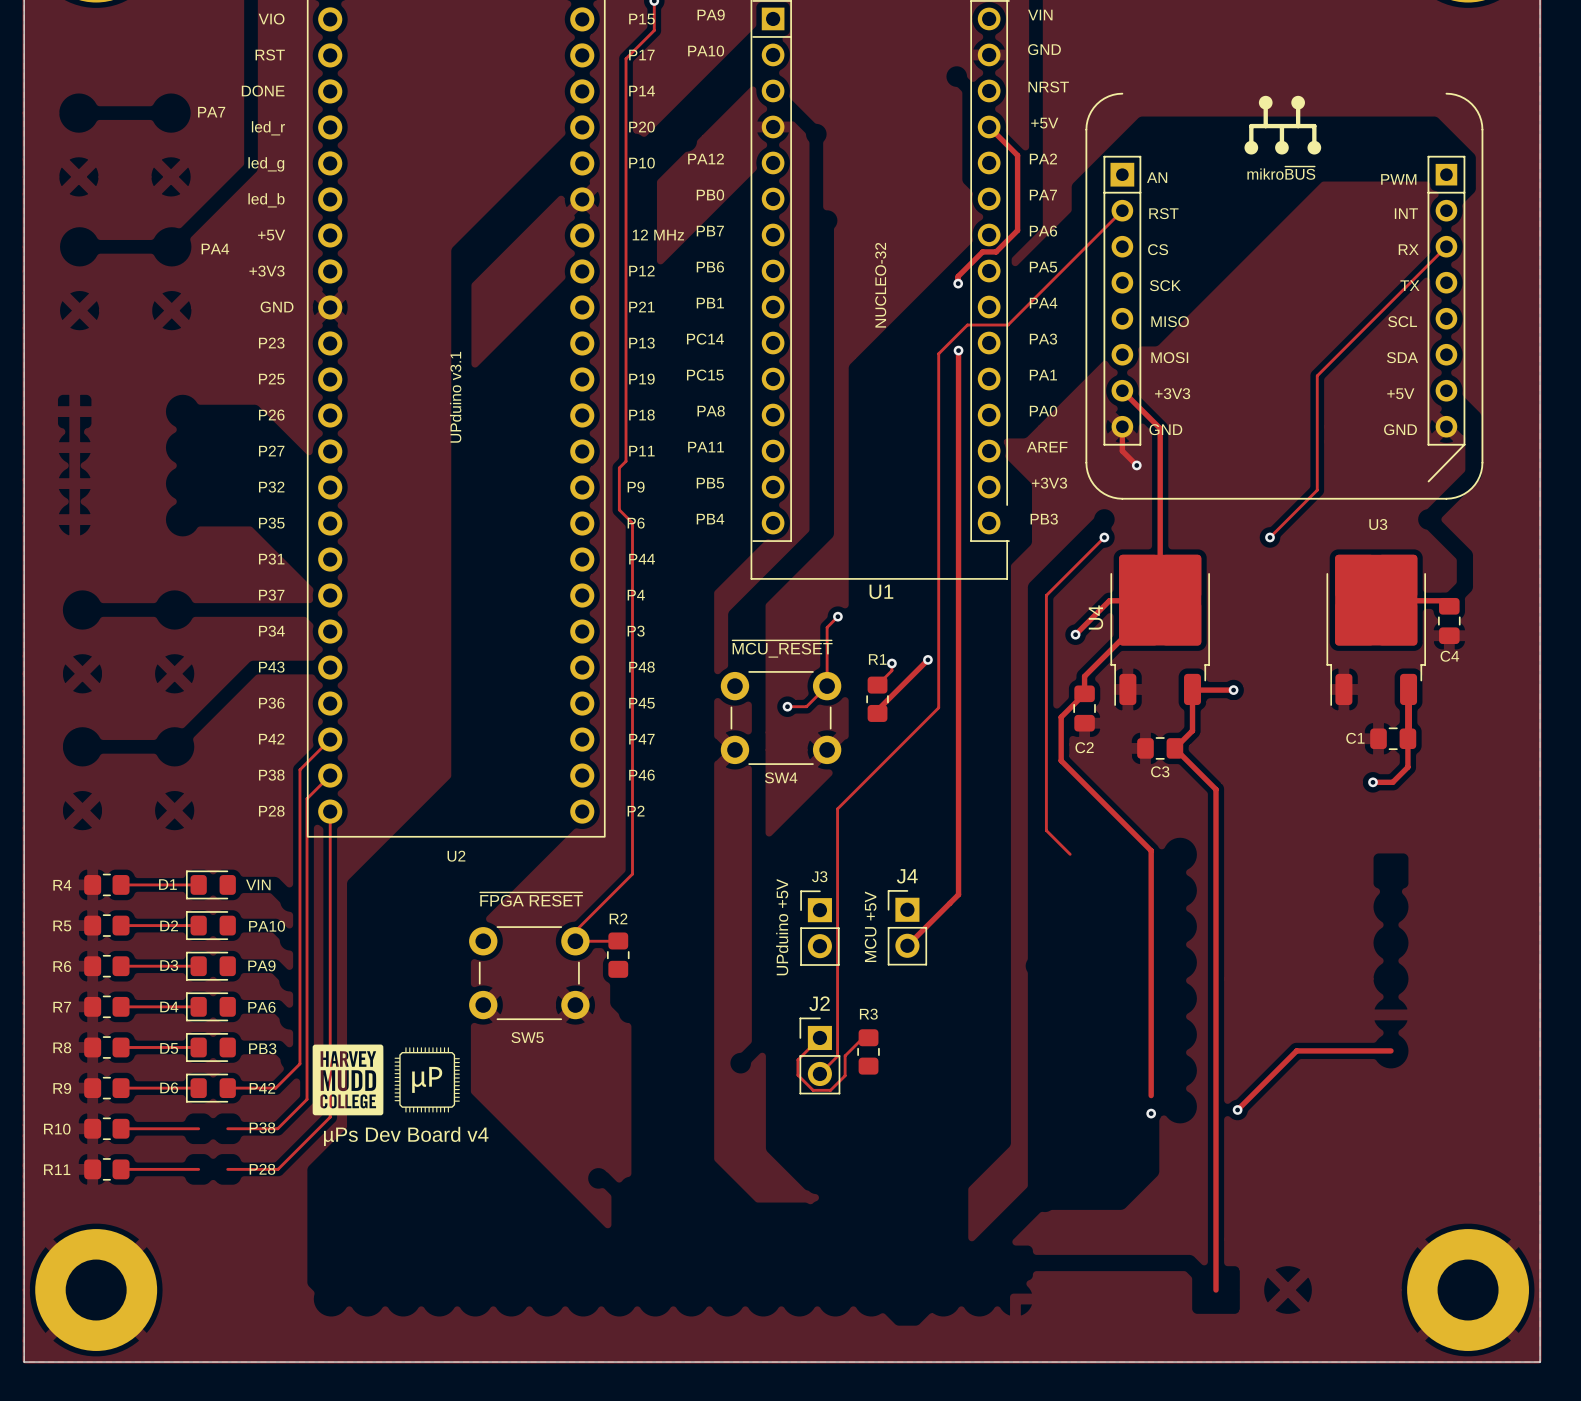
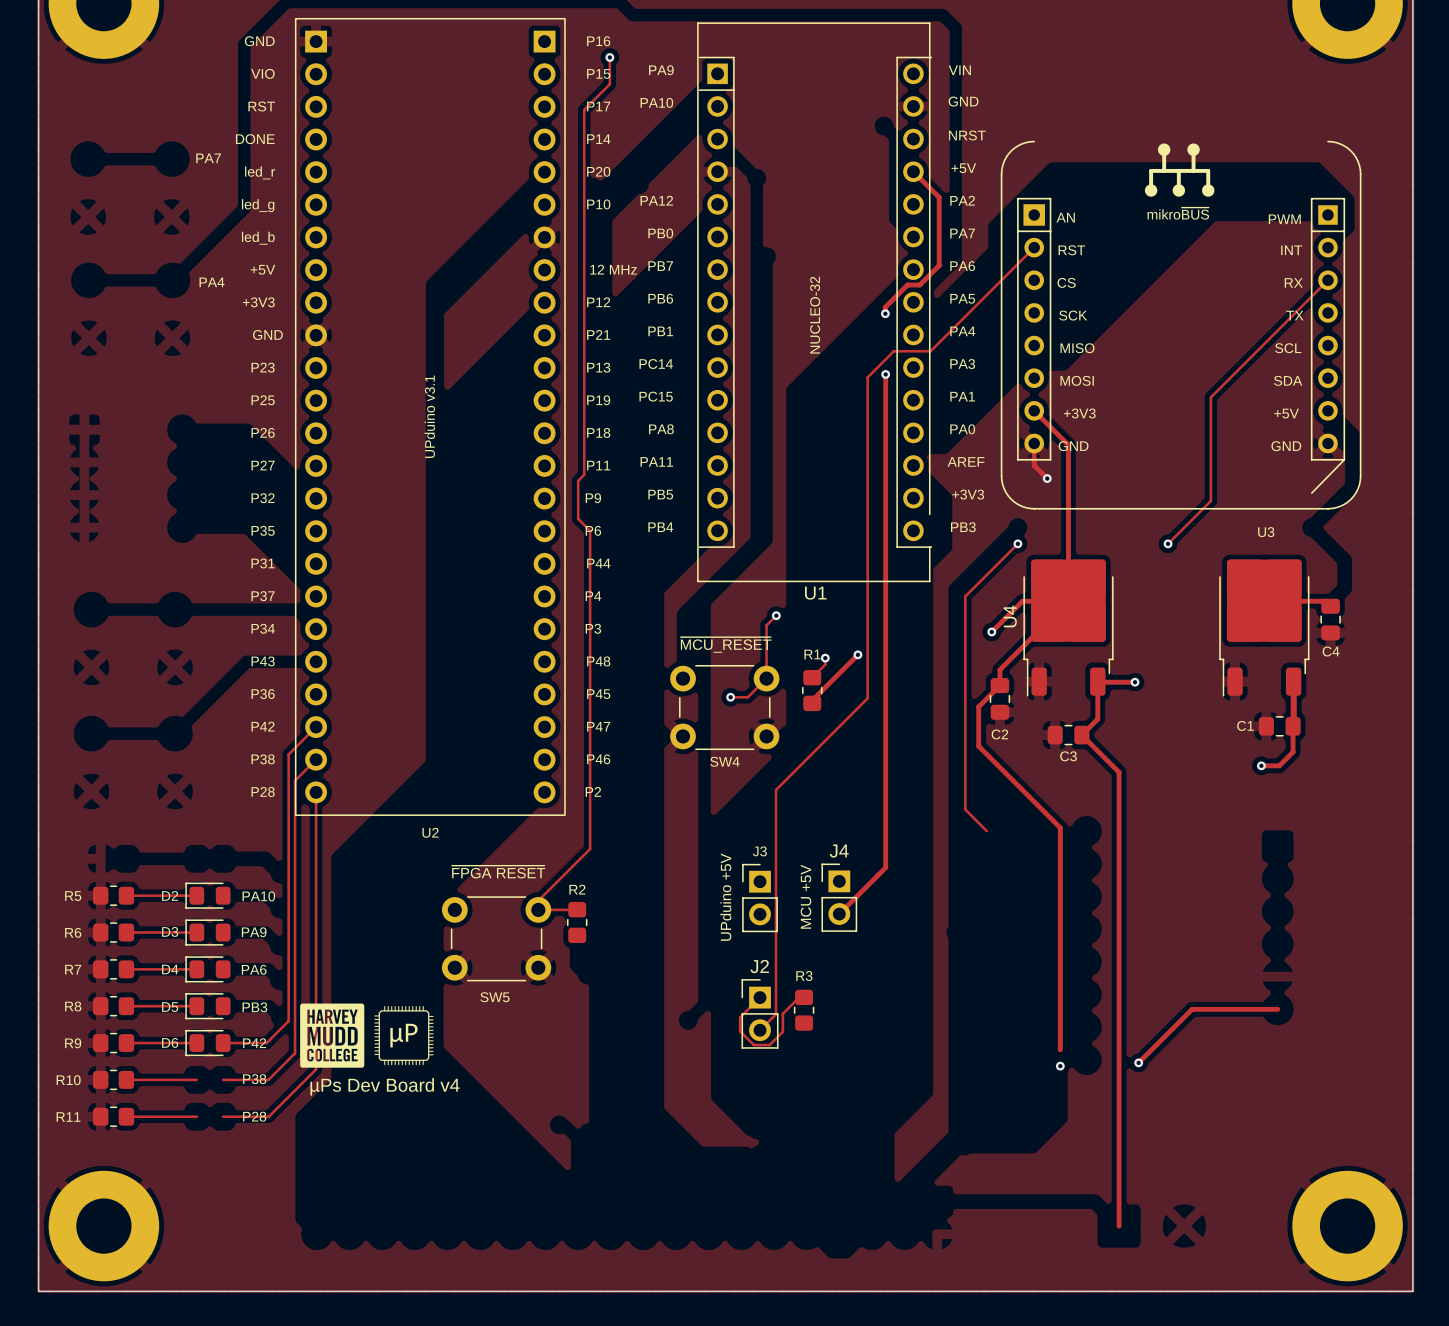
R4: (106, 884) -> none
track: (121, 884) (198, 884) -> none
D1: (210, 884) -> none
text: VIN (258, 884) -> none

